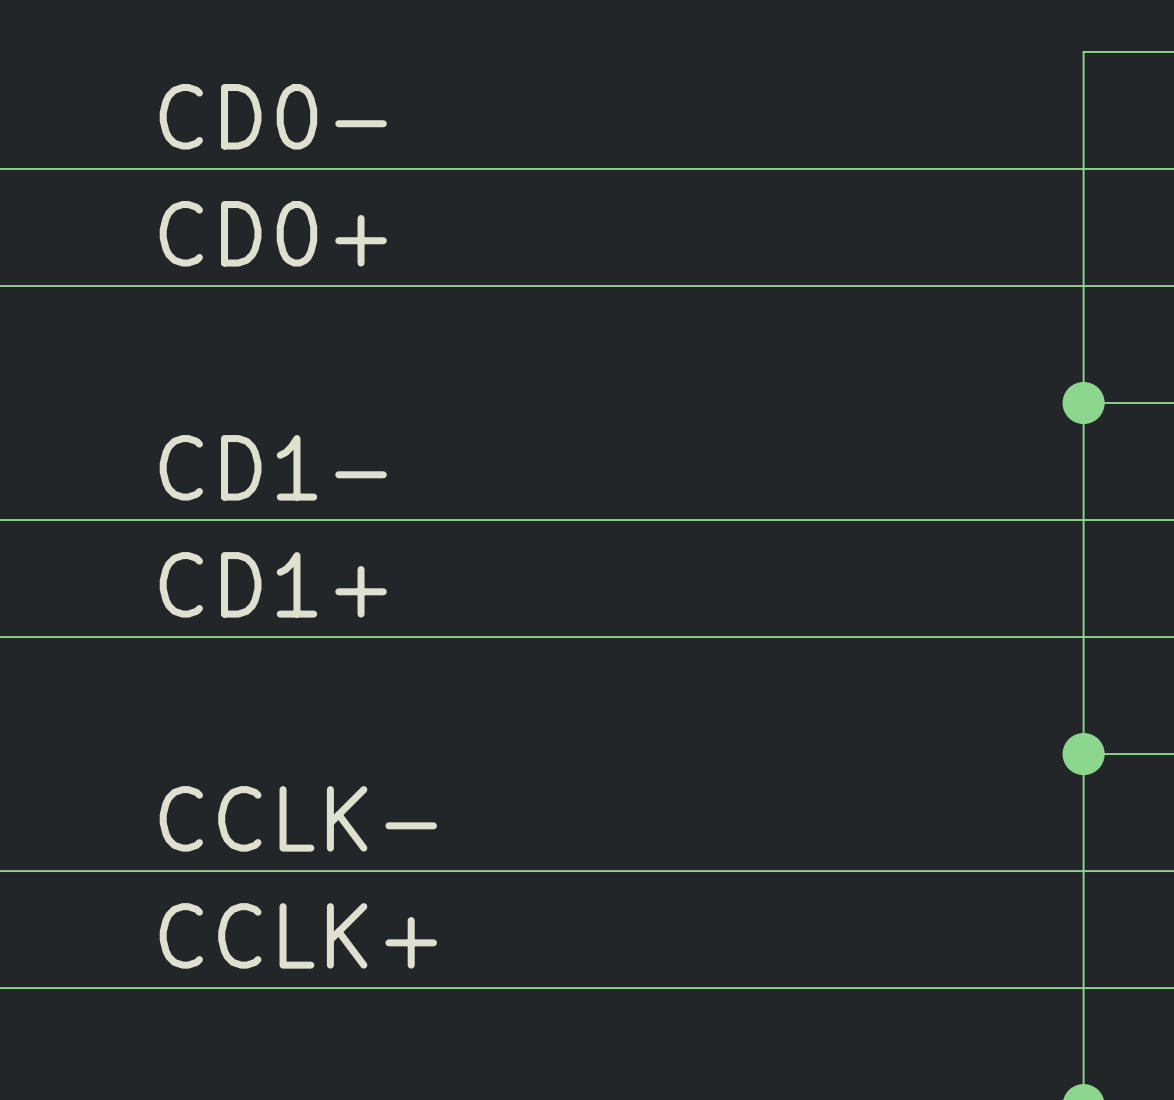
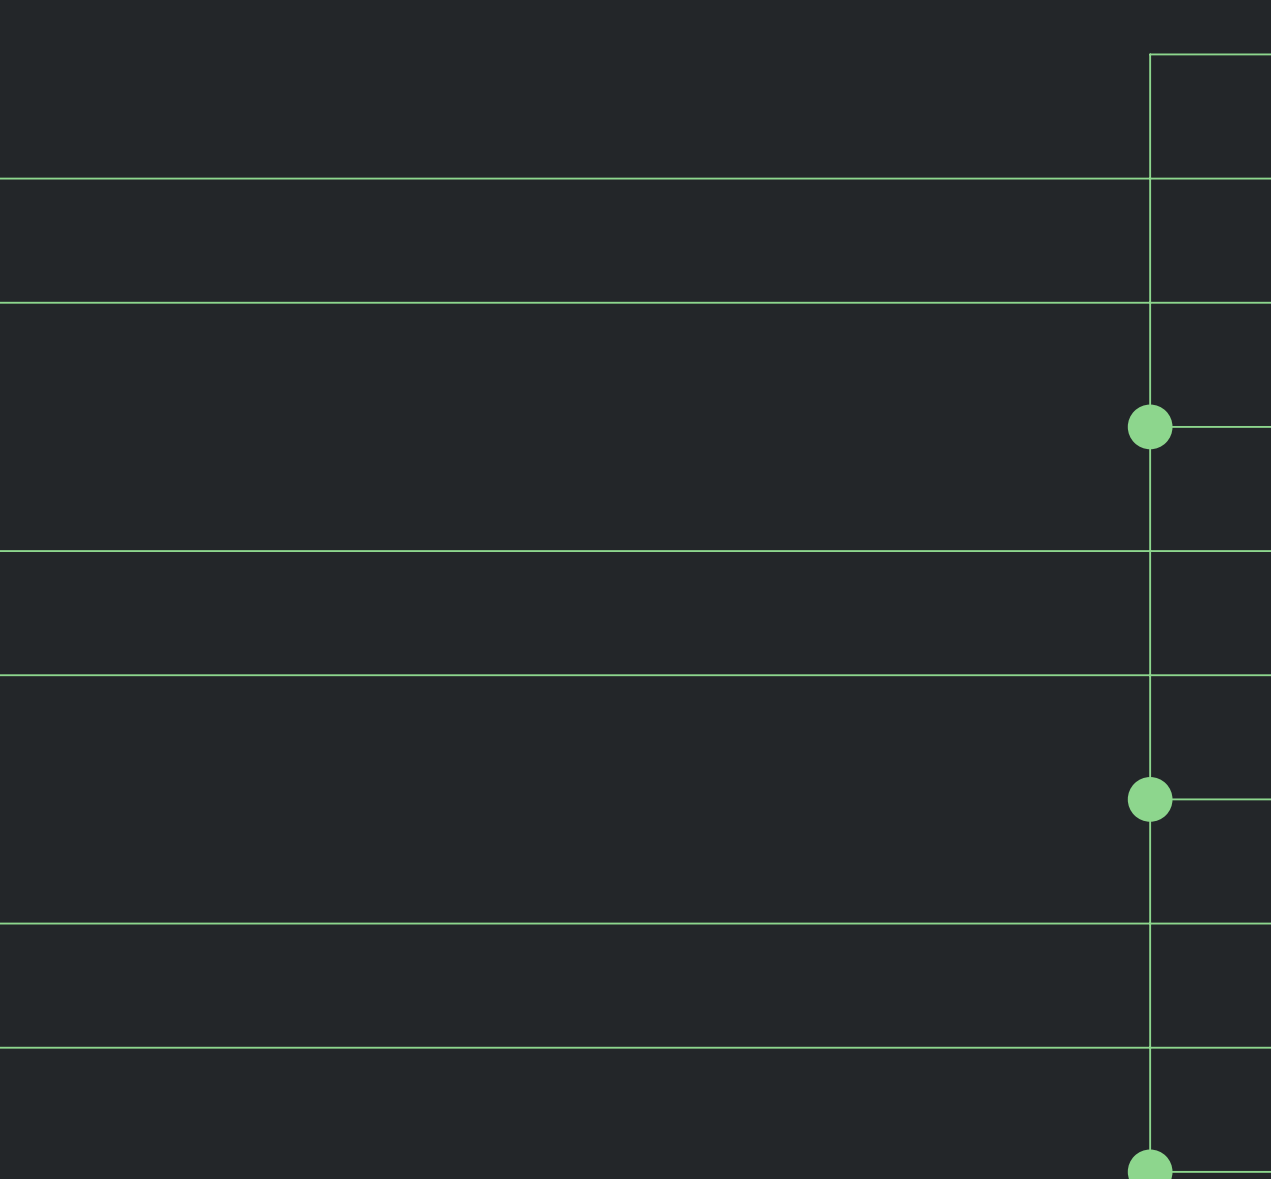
label: CD0- (273, 116) -> none
label: CD0+ (273, 233) -> none
label: CD1- (273, 467) -> none
label: CD1+ (273, 584) -> none
label: CCLK- (298, 818) -> none
label: CCLK+ (298, 935) -> none

